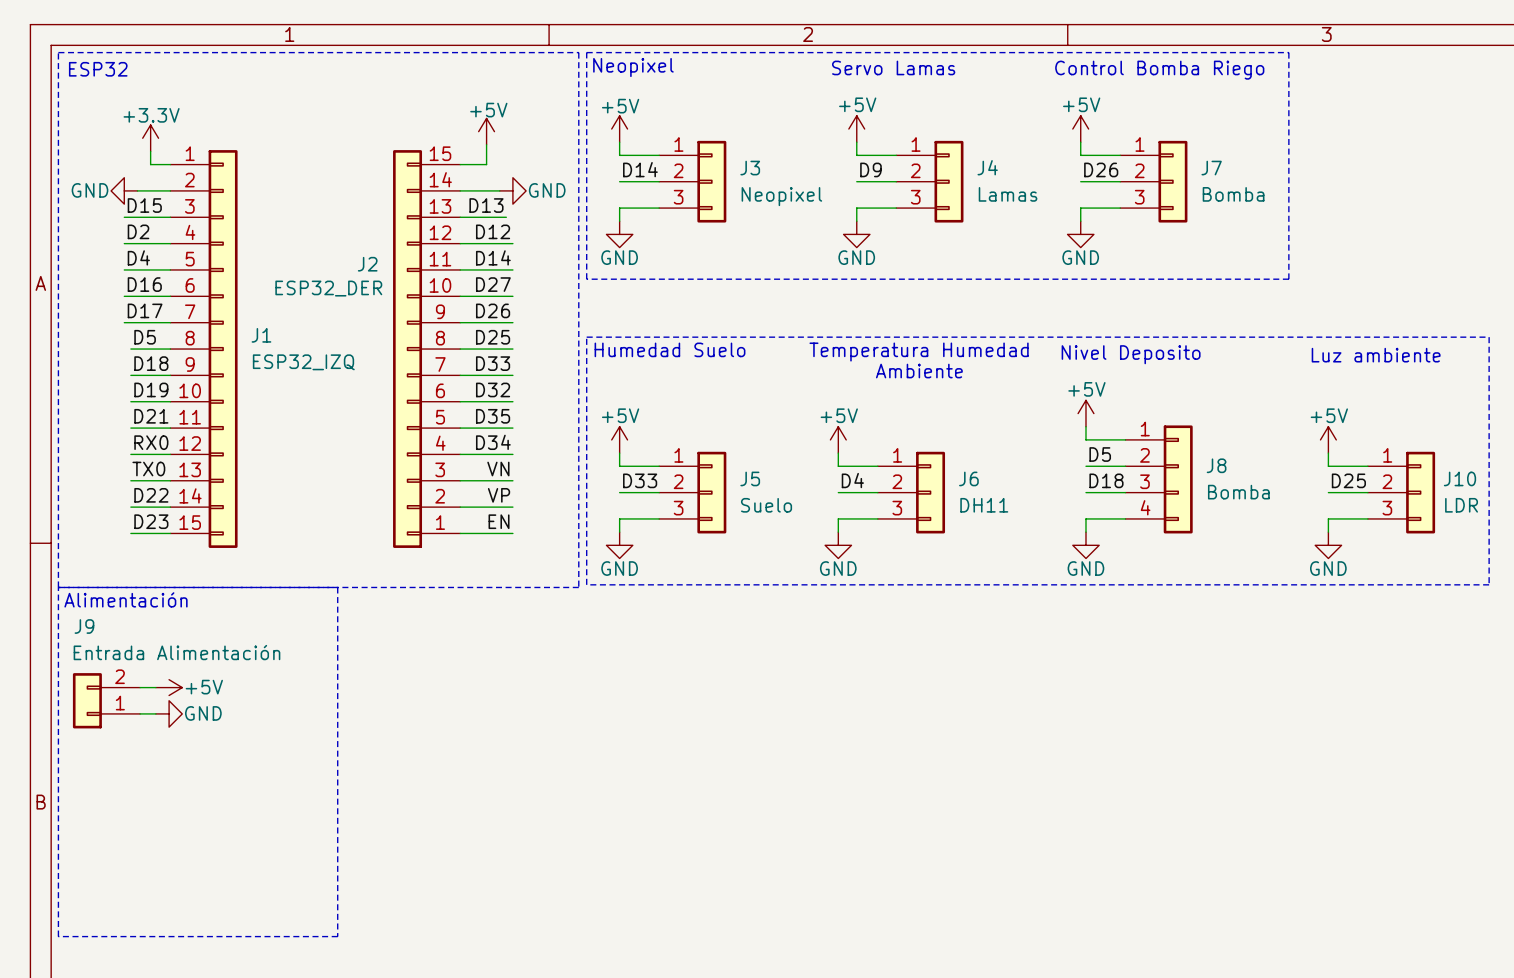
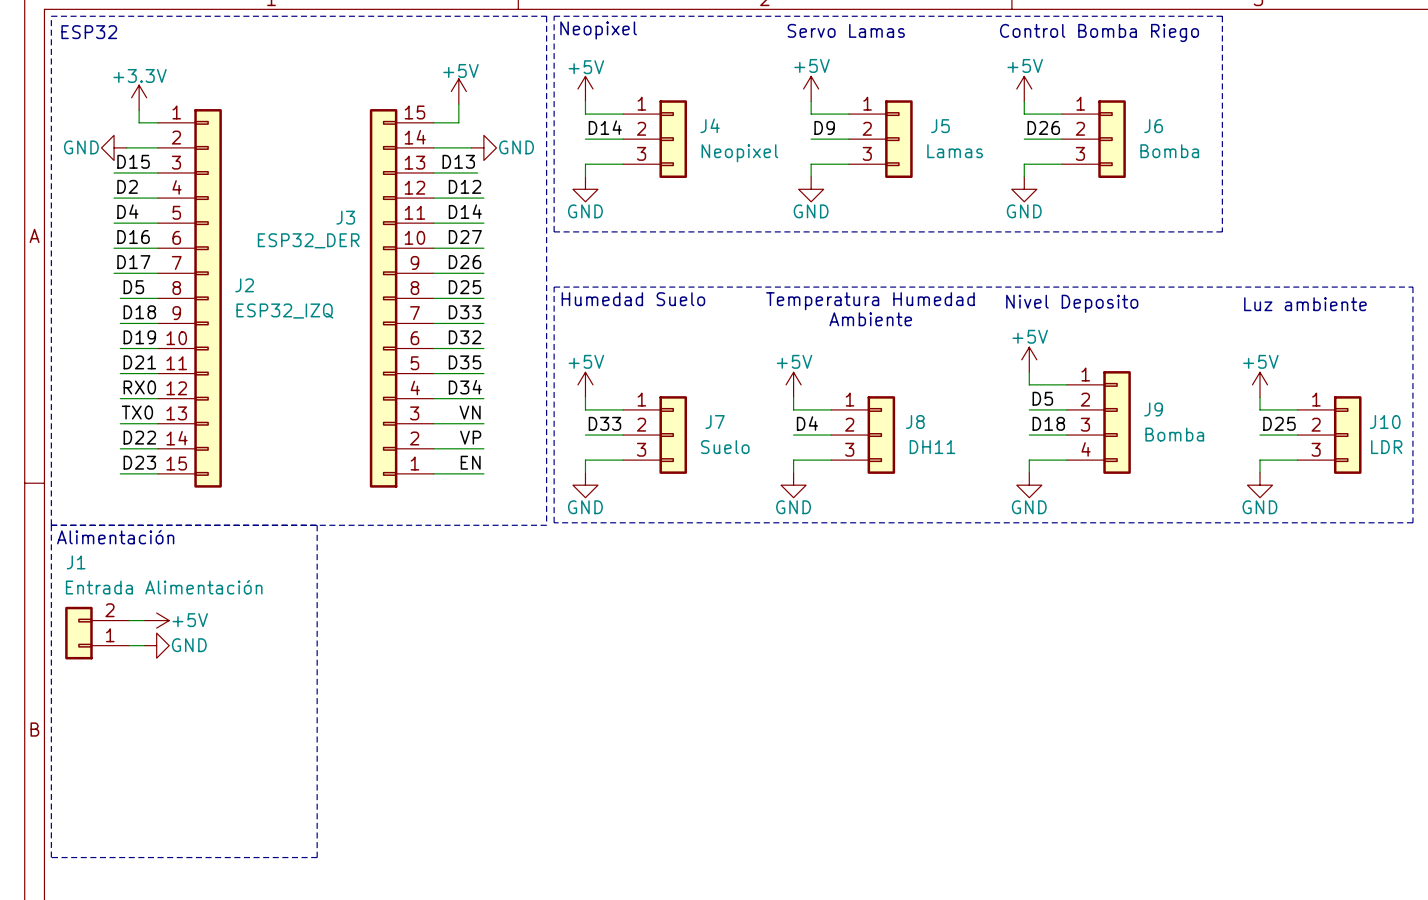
J4 name: J4 (987, 167) -> J5 (940, 126)
J3 name: J3 (750, 168) -> J4 (710, 125)
J7 name: J7 (1211, 168) -> J6 (1153, 126)
J2 name: J2 (367, 264) -> J3 (345, 217)
J1 name: J1 (261, 335) -> J2 (244, 285)
J8 name: J8 (1216, 465) -> J9 (1153, 409)
J5 name: J5 (750, 478) -> J7 (715, 422)
J6 name: J6 (968, 478) -> J8 (915, 422)
J9 name: J9 (84, 626) -> J1 (76, 562)

